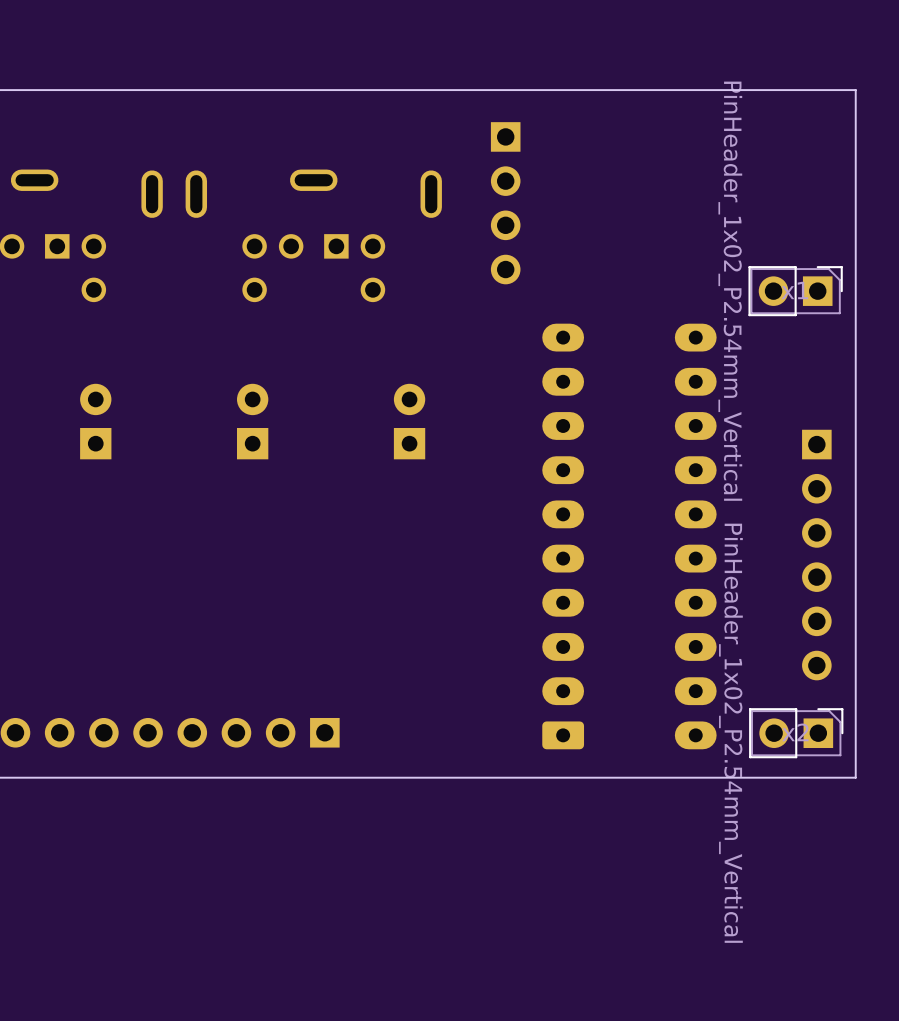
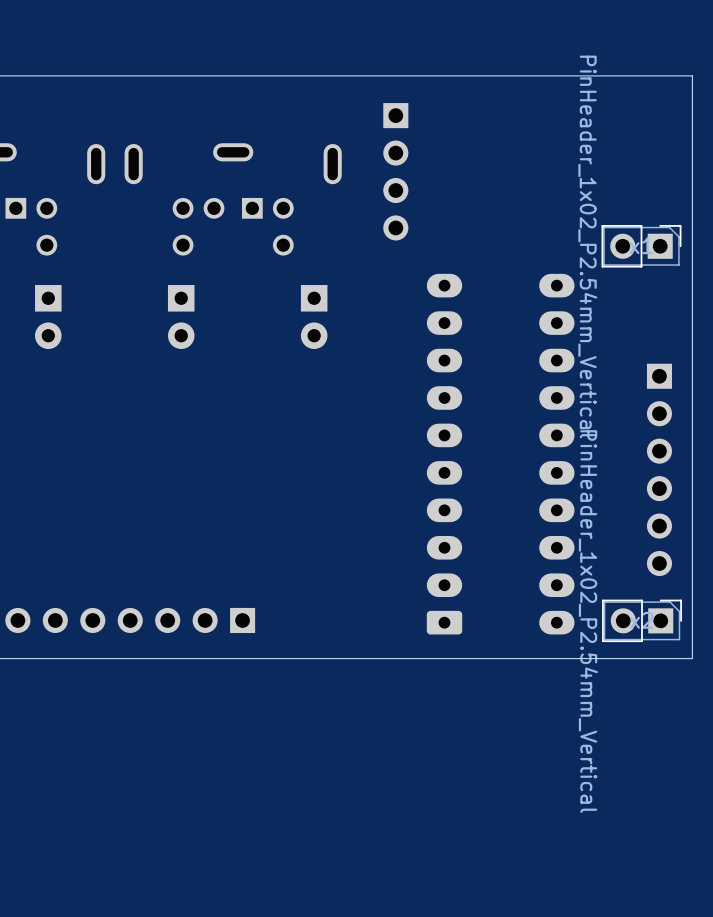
part rotation: 0° (95, 421) -> 180° (48, 317)
part position: (95, 421) -> (48, 317)
part rotation: 0° (252, 421) -> 180° (181, 317)
part position: (252, 421) -> (181, 317)
part rotation: 0° (409, 421) -> 180° (314, 317)
part position: (409, 421) -> (314, 317)

